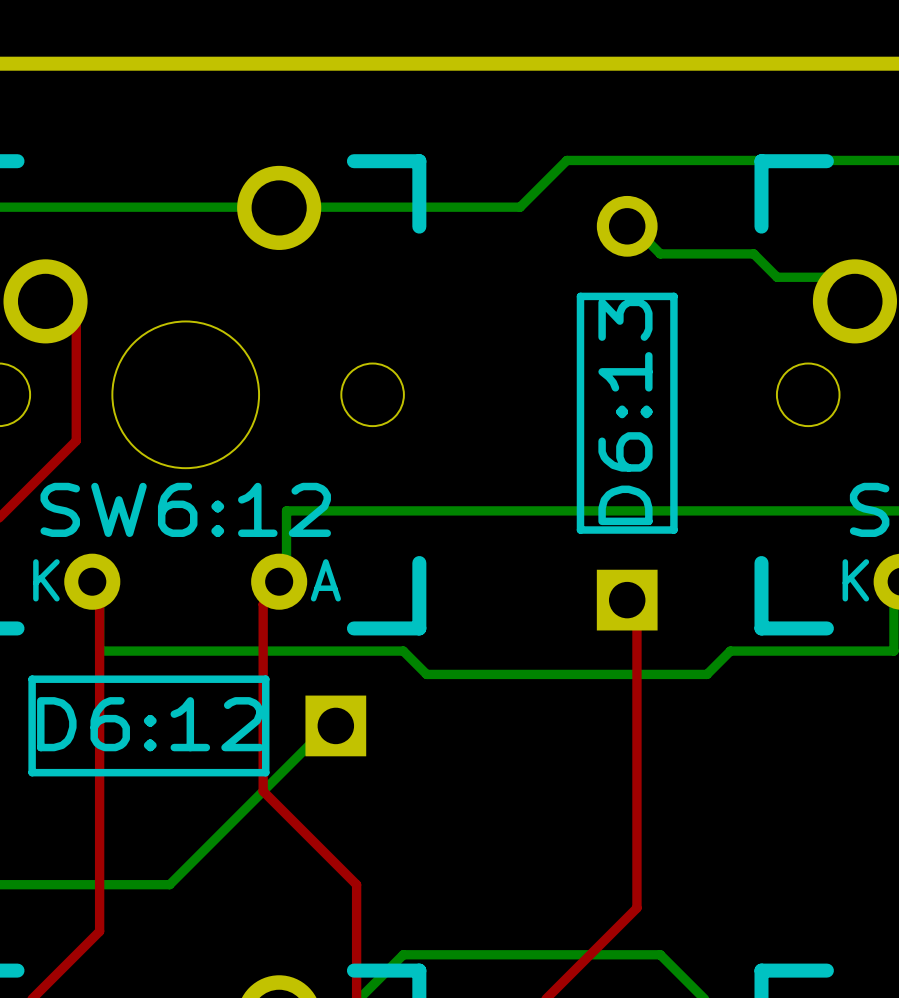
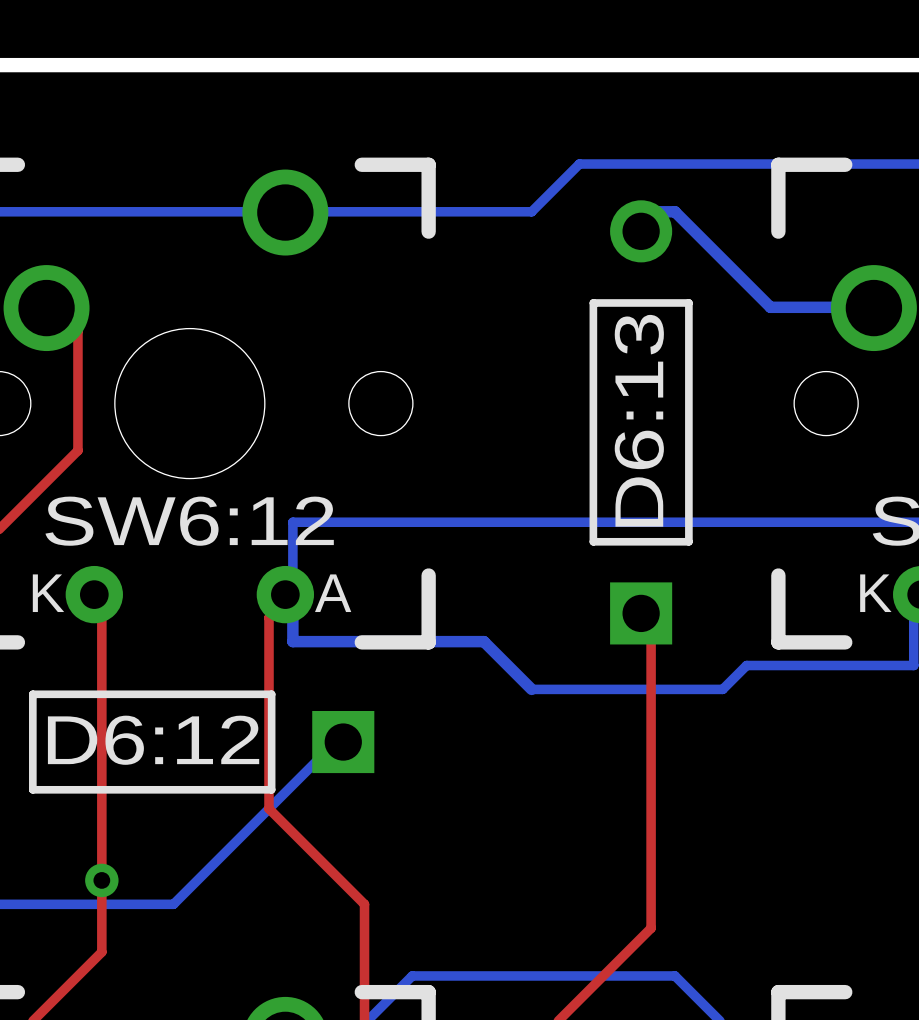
bottom track: (627, 226) (636, 230) (660, 253) (753, 253) (777, 277) (823, 277) (847, 300) -> (641, 231) (627, 211) (674, 211) (770, 307) (866, 307)
bottom track: (99, 580) (99, 651) (403, 651) (426, 674) (520, 674) -> (292, 593) (292, 641) (483, 641) (531, 689)
via: none -> (101, 880)

